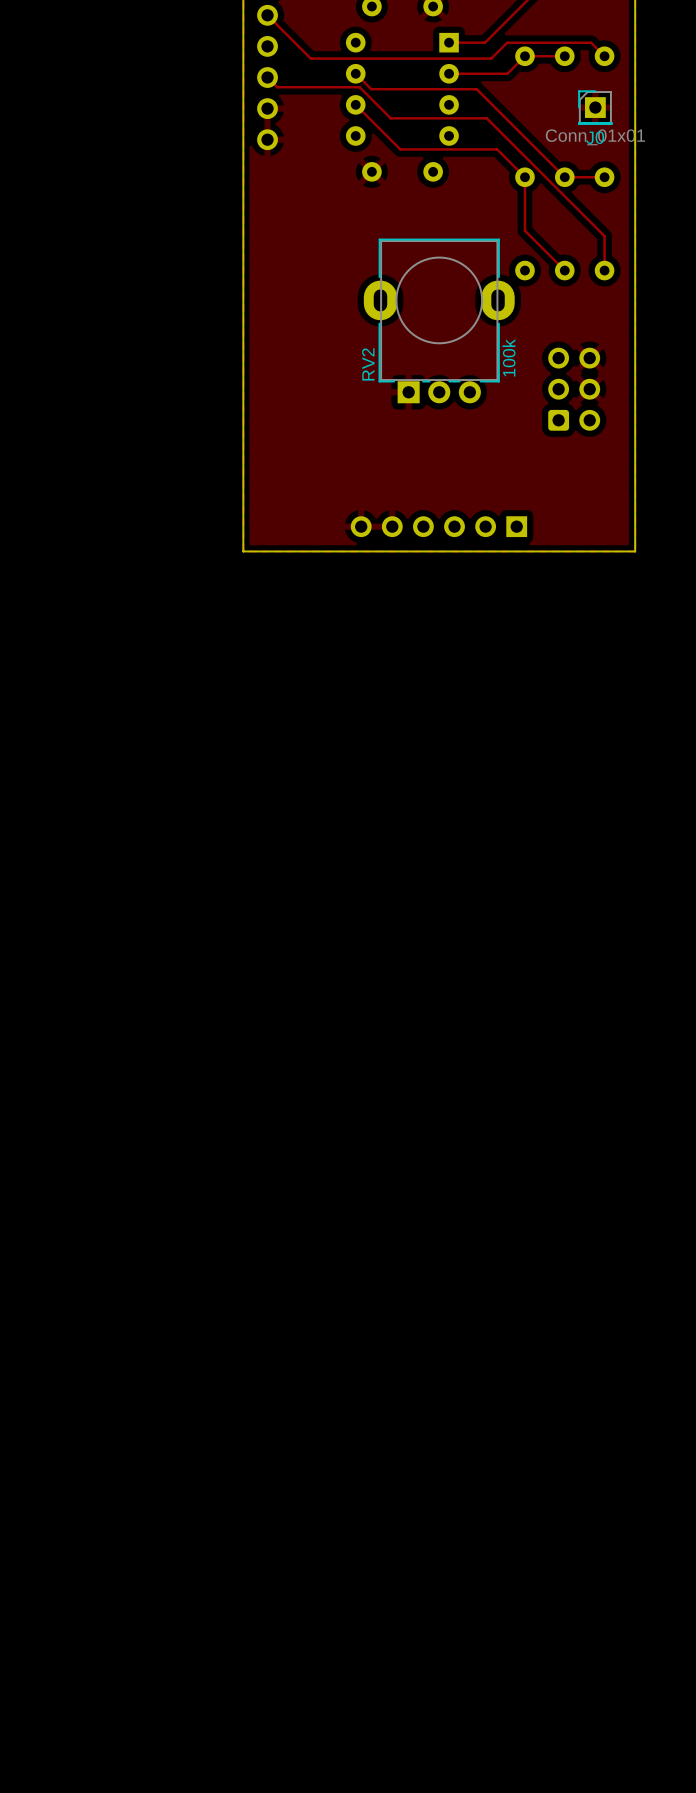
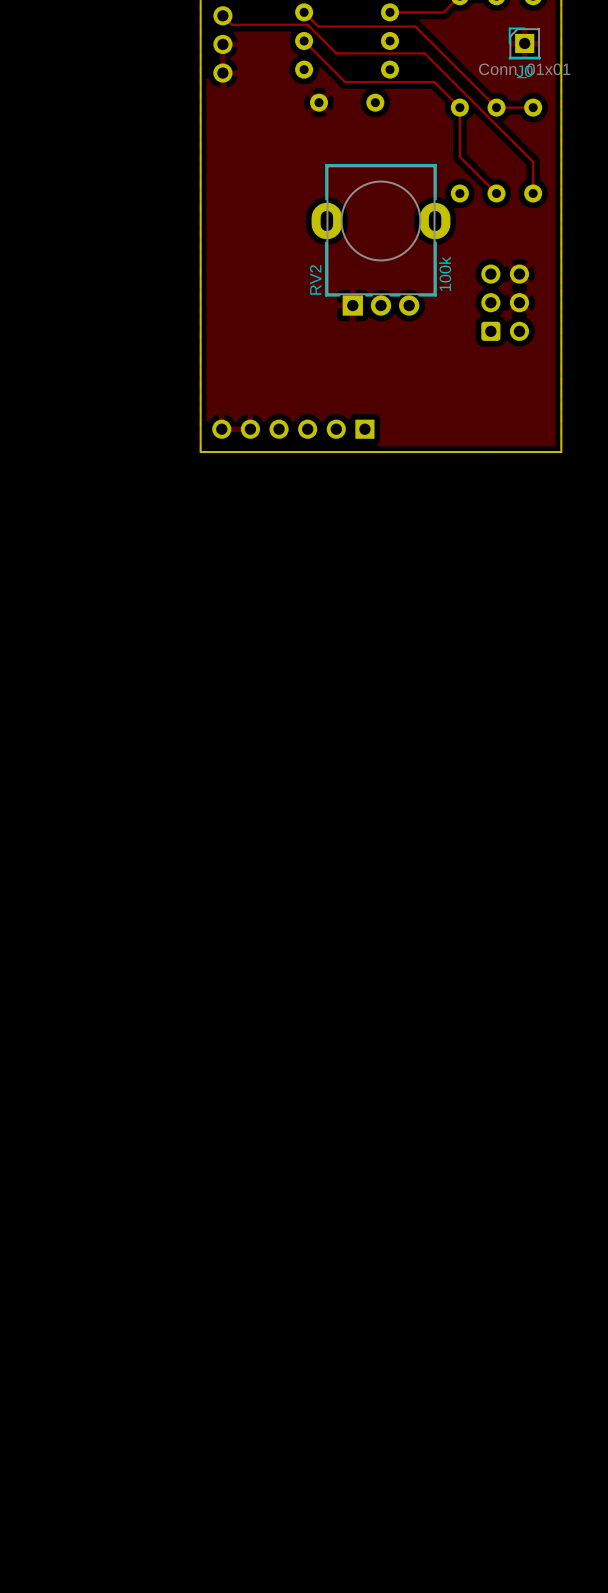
part position: (438, 526) -> (293, 429)

